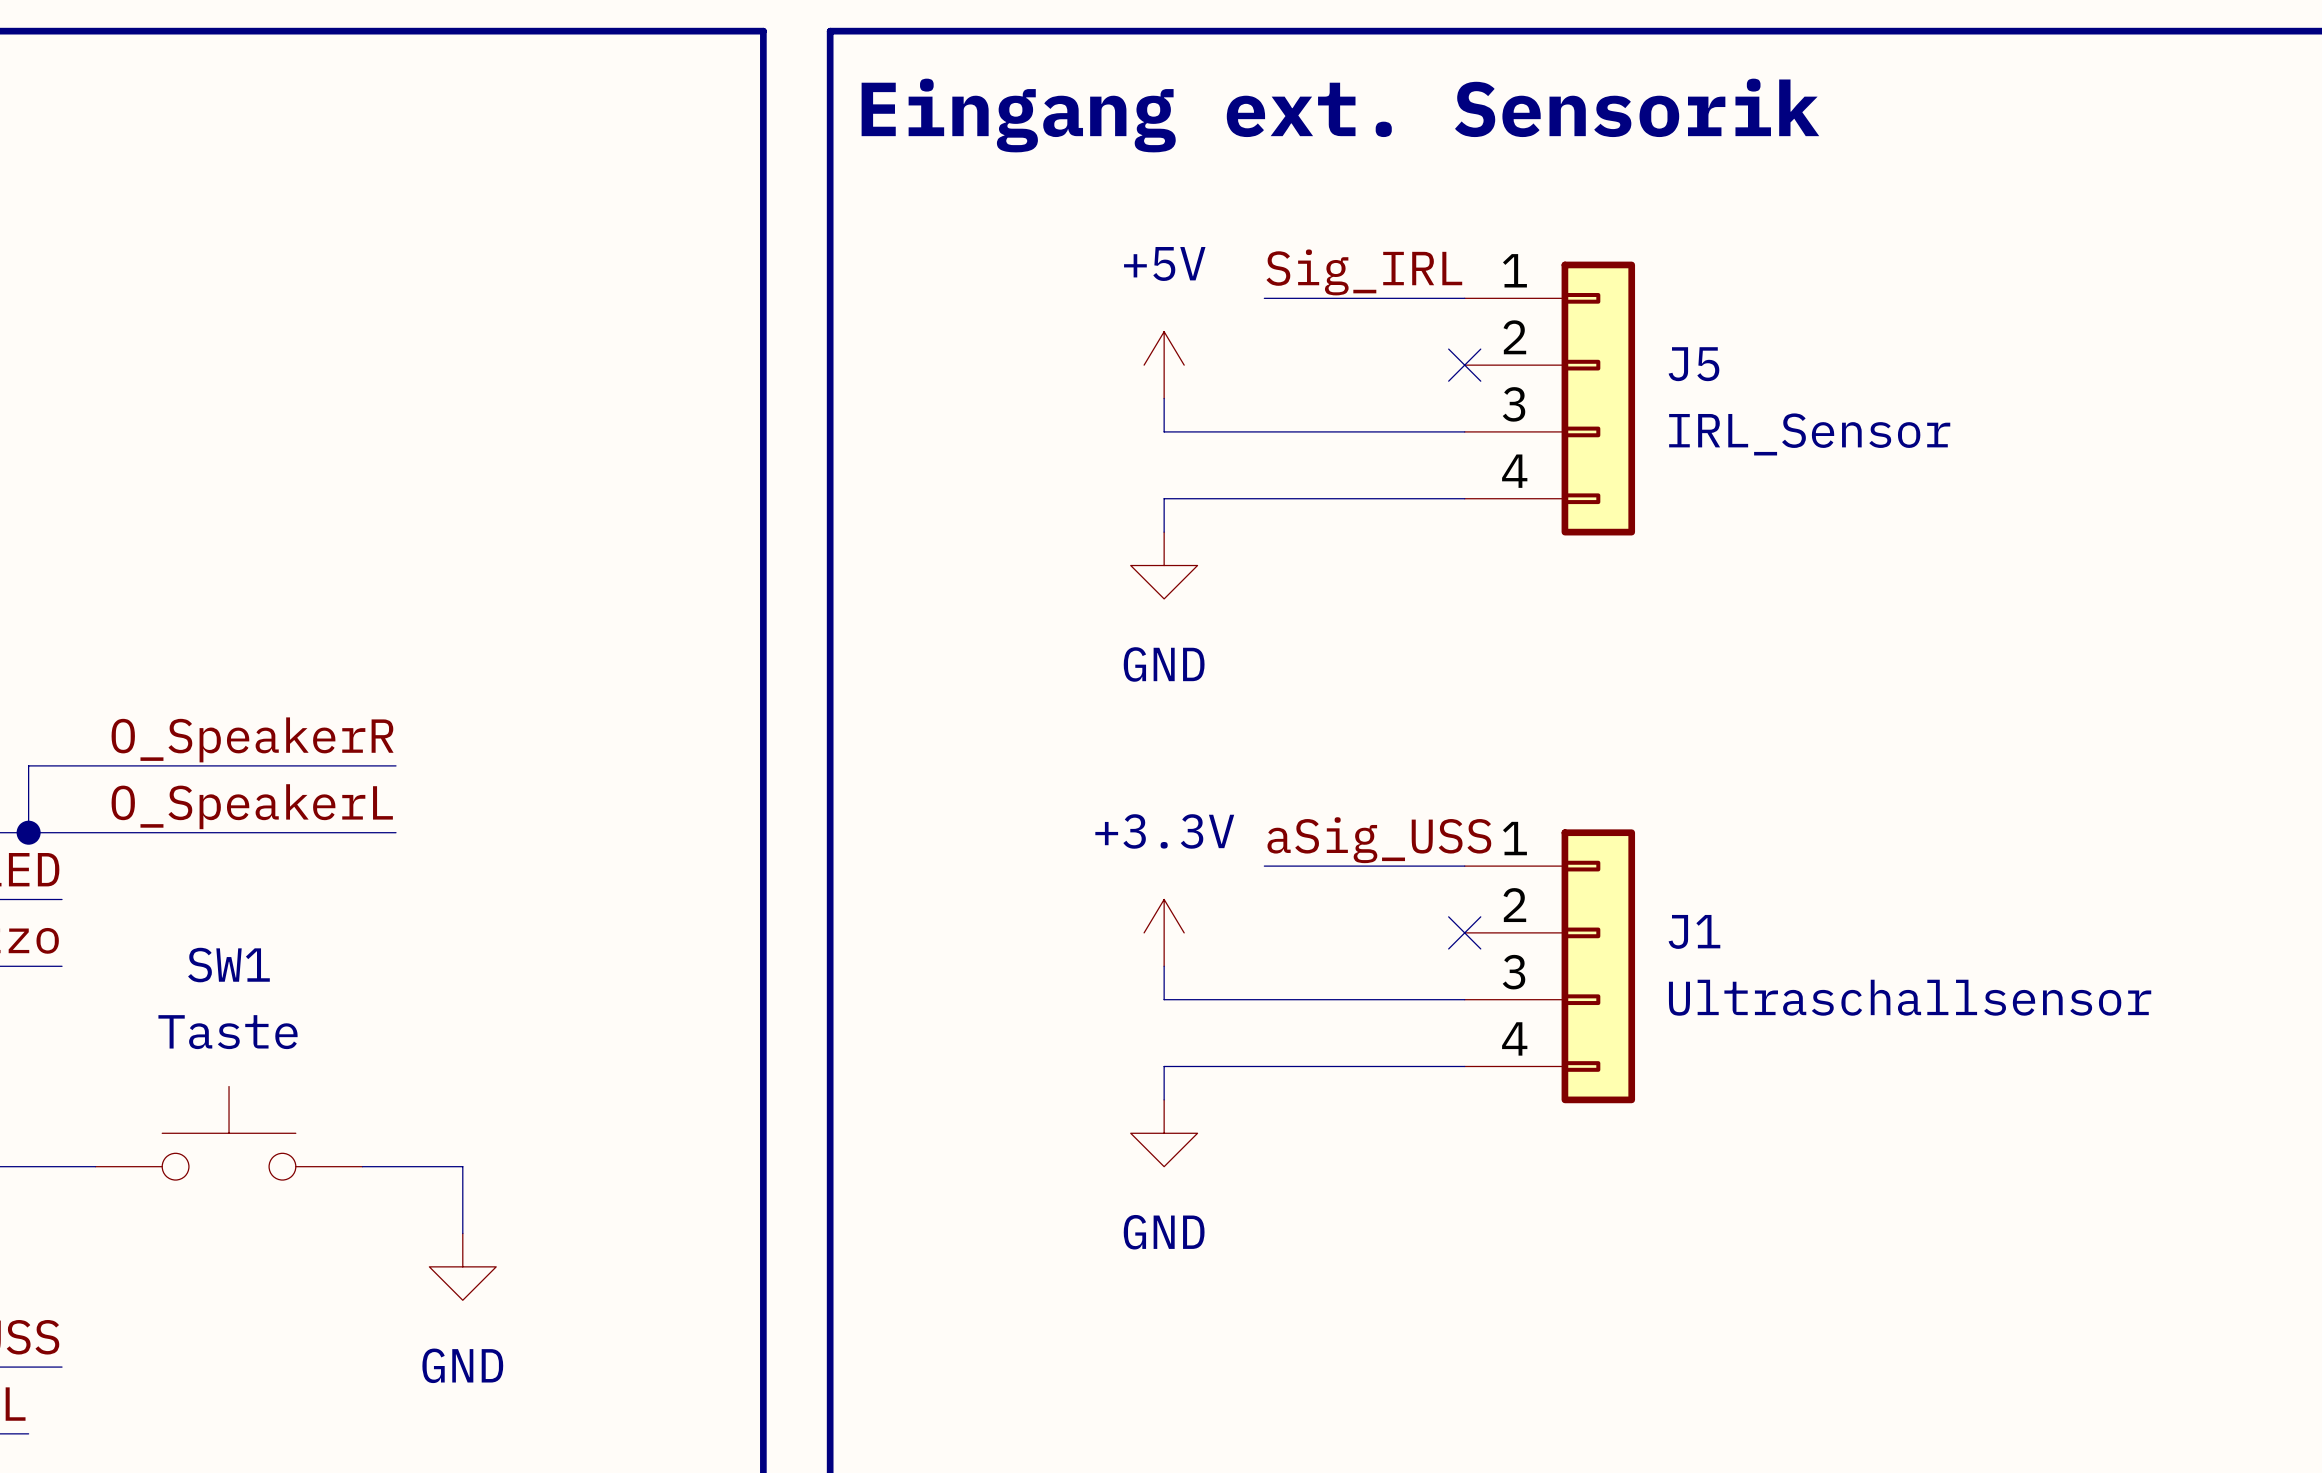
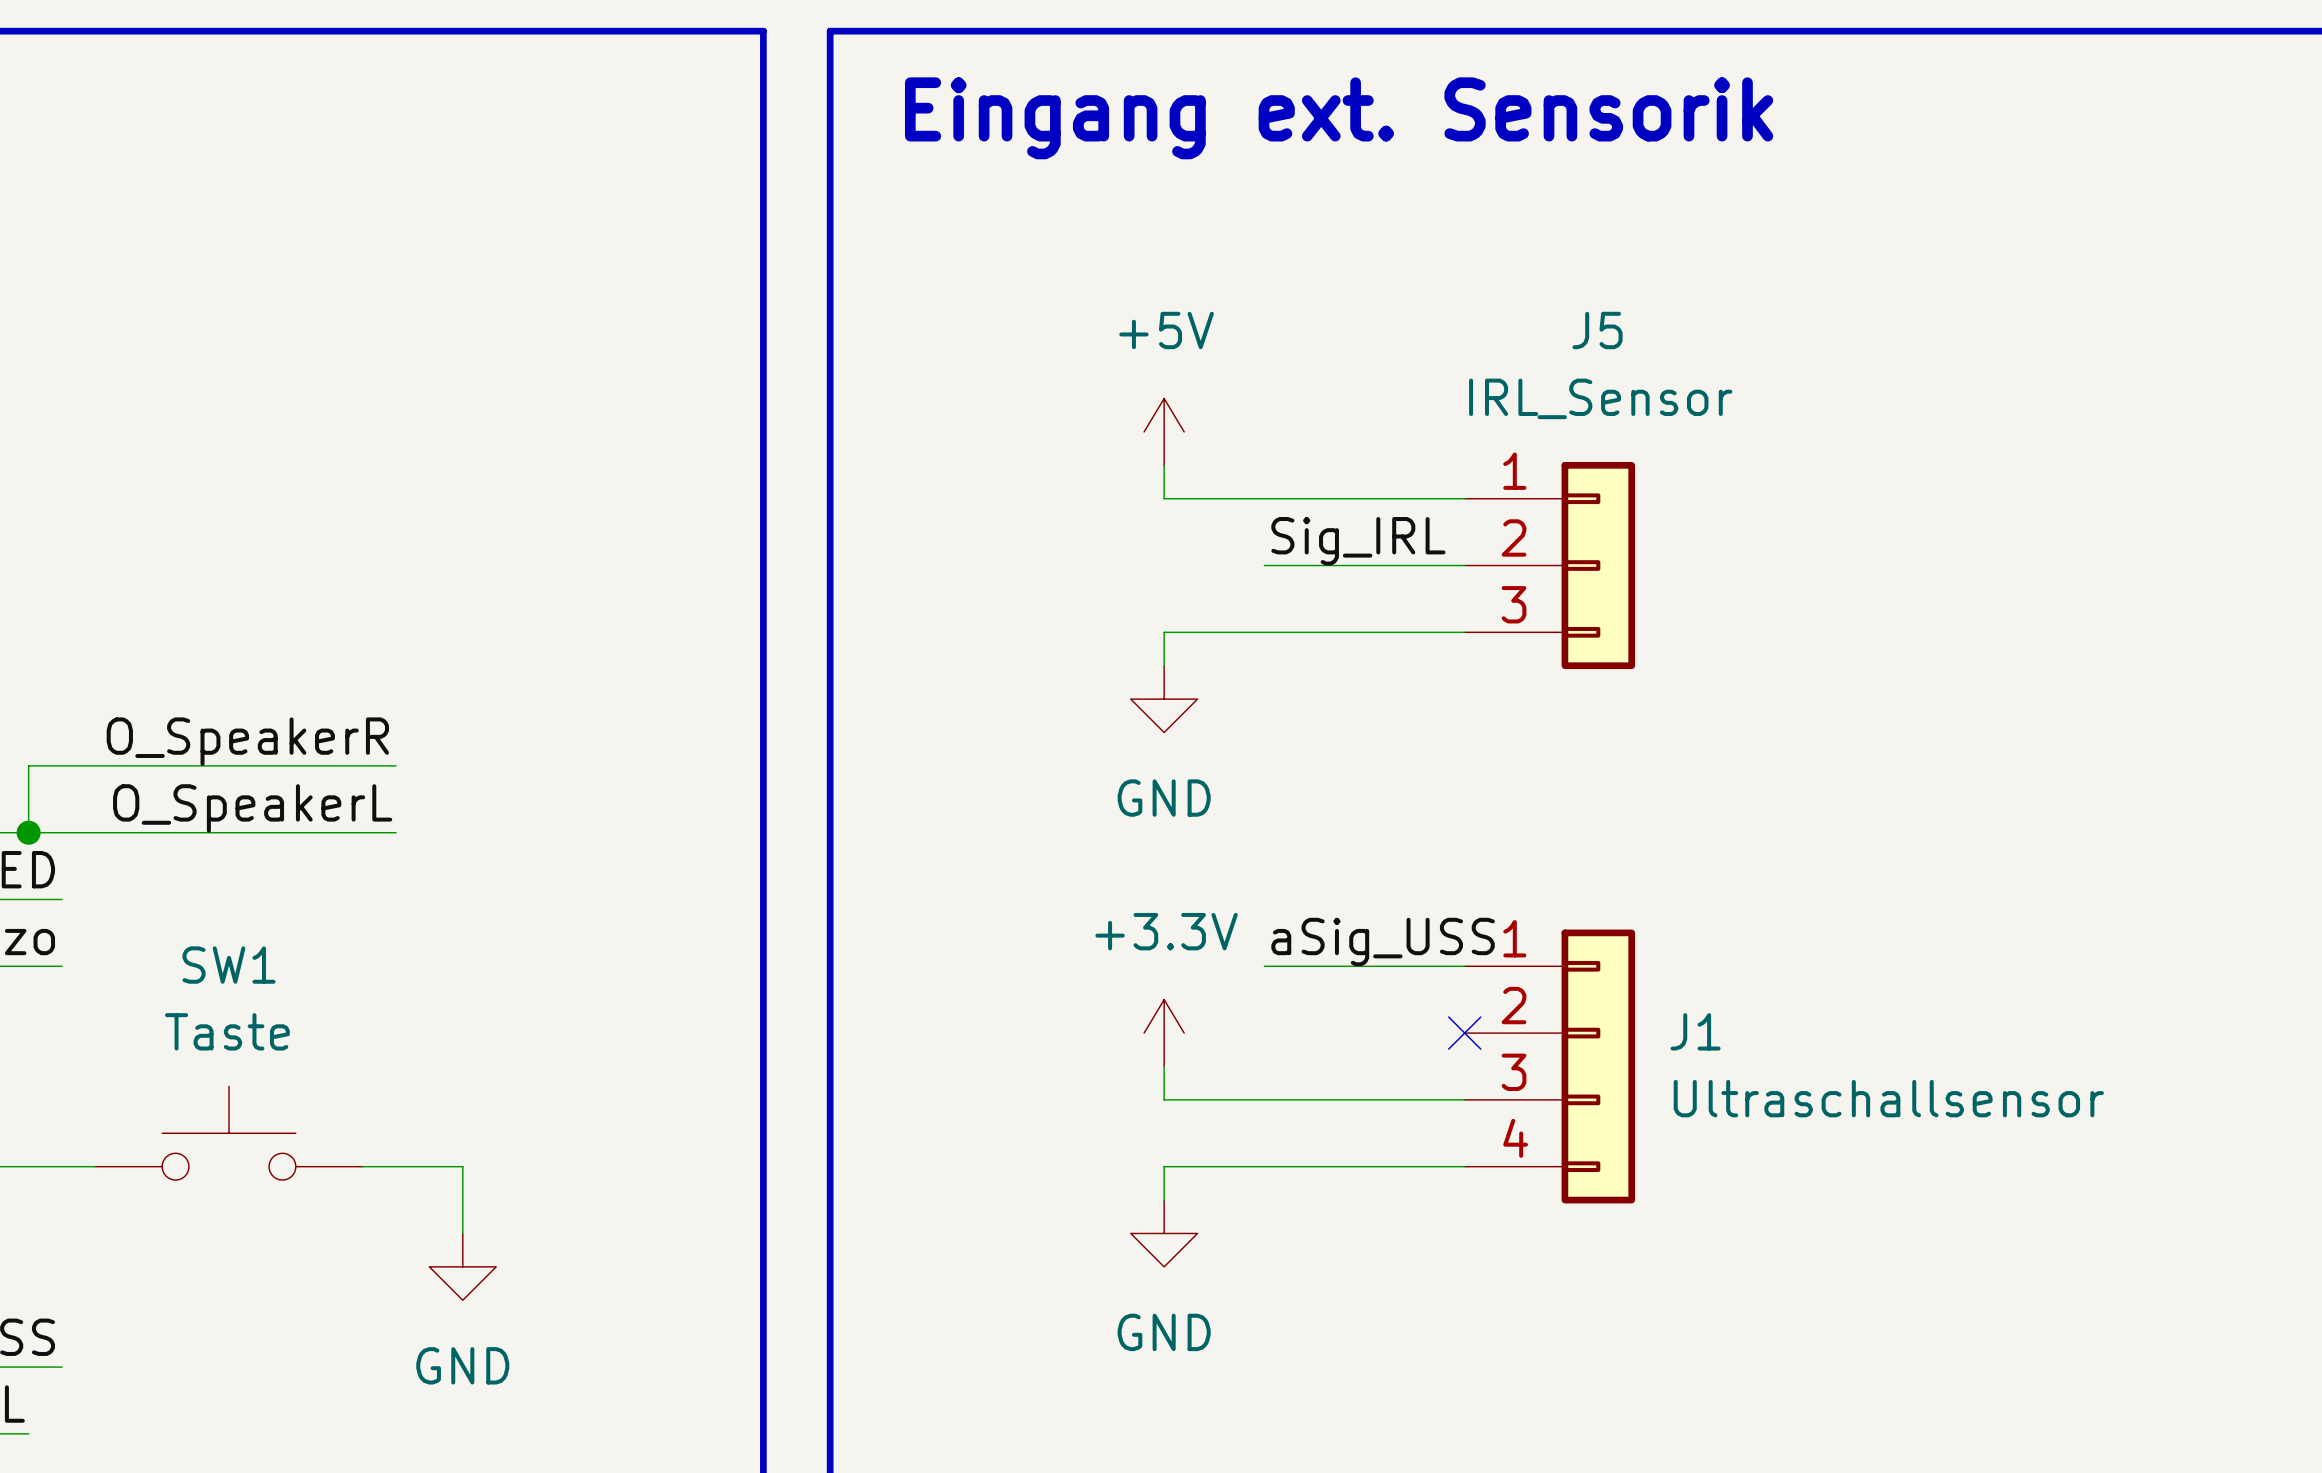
J5 symbol: [1464, 261, 1636, 536] -> [1464, 461, 1636, 670]
label position: Sig_IRL (1364, 272) -> Sig_IRL (1358, 541)
wire: (1264, 298) (1464, 298) -> (1264, 565) (1464, 565)
J5 name position: J5 (1693, 364) -> J5 (1597, 330)
power symbol position: +5V (1164, 365) -> +5V (1164, 431)
no-connect mark: (1464, 365) -> none
wire: (1164, 398) (1164, 431) (1464, 431) -> none
J5 value position: IRL_Sensor (1809, 434) -> IRL_Sensor (1600, 398)
wire: (1164, 498) (1164, 532) -> (1164, 498) (1164, 465)
power symbol position: GND (1164, 565) -> GND (1164, 699)
wire: none -> (1464, 632) (1164, 632) (1164, 665)
label position: aSig_USS (1379, 840) -> aSig_USS (1383, 942)
wire: (1264, 866) (1464, 866) -> (1264, 966) (1464, 966)
power symbol position: +3.3V (1164, 932) -> +3.3V (1164, 1033)
no-connect mark position: (1464, 932) -> (1464, 1033)
wire: (1164, 966) (1164, 999) (1464, 999) -> none
J1 position: (1549, 966) -> (1549, 1066)
wire: (1164, 1066) (1464, 1066) -> (1164, 1099) (1464, 1099)
power symbol position: GND (1164, 1133) -> GND (1164, 1233)
wire: none -> (1464, 1166) (1164, 1166) (1164, 1200)

